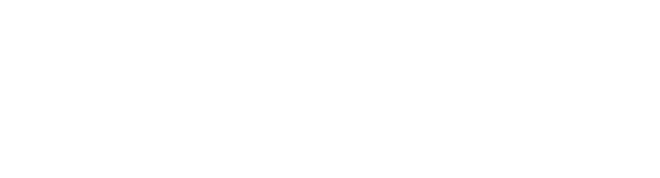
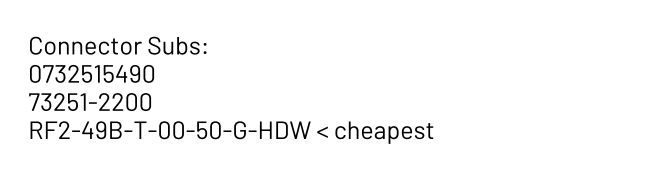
text: none -> Connector Subs: (118, 45)
text: none -> 0732515490 (92, 73)
text: none -> 73251-2200 (90, 102)
text: none -> RF2-49B-T-00-50-G-HDW < cheapest (231, 132)

